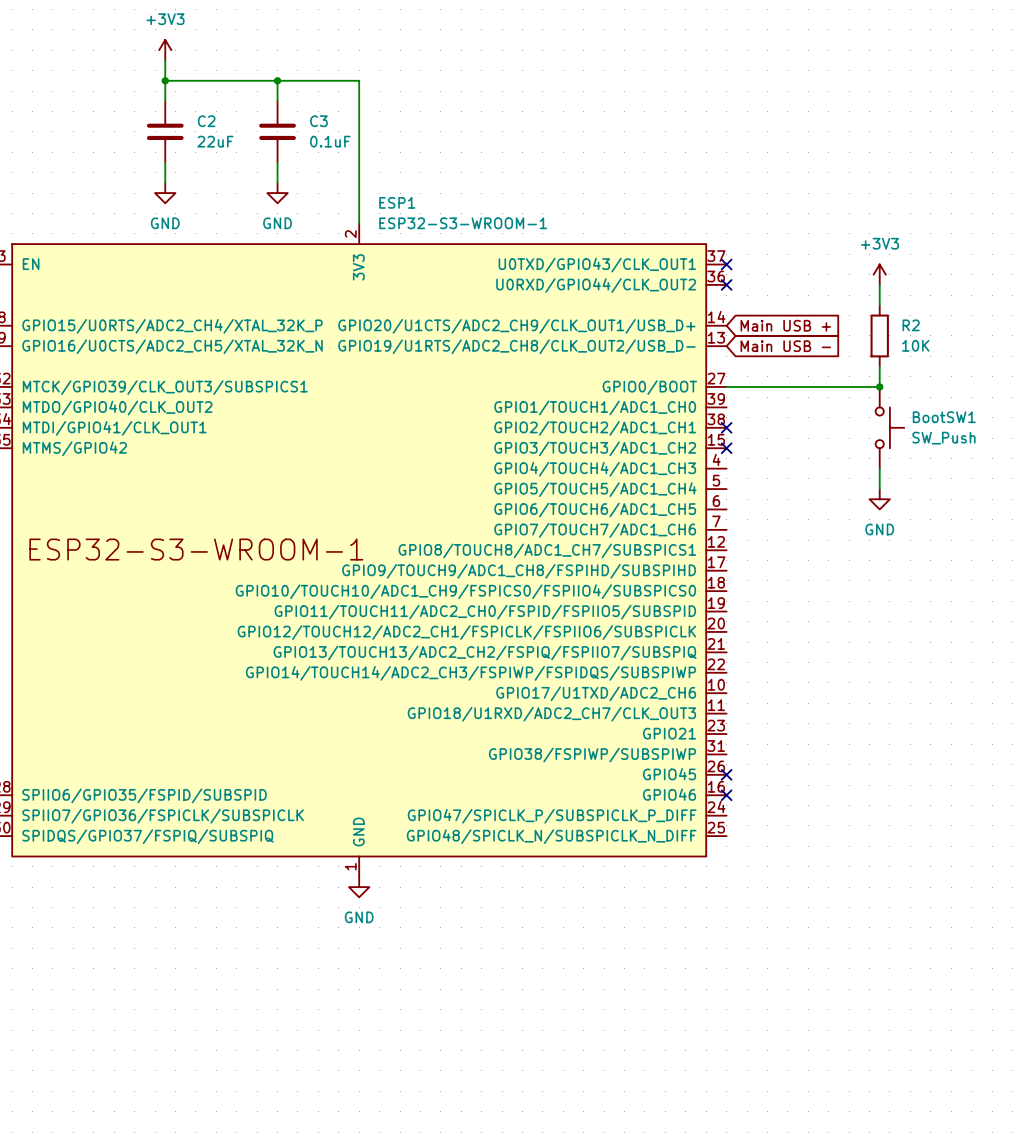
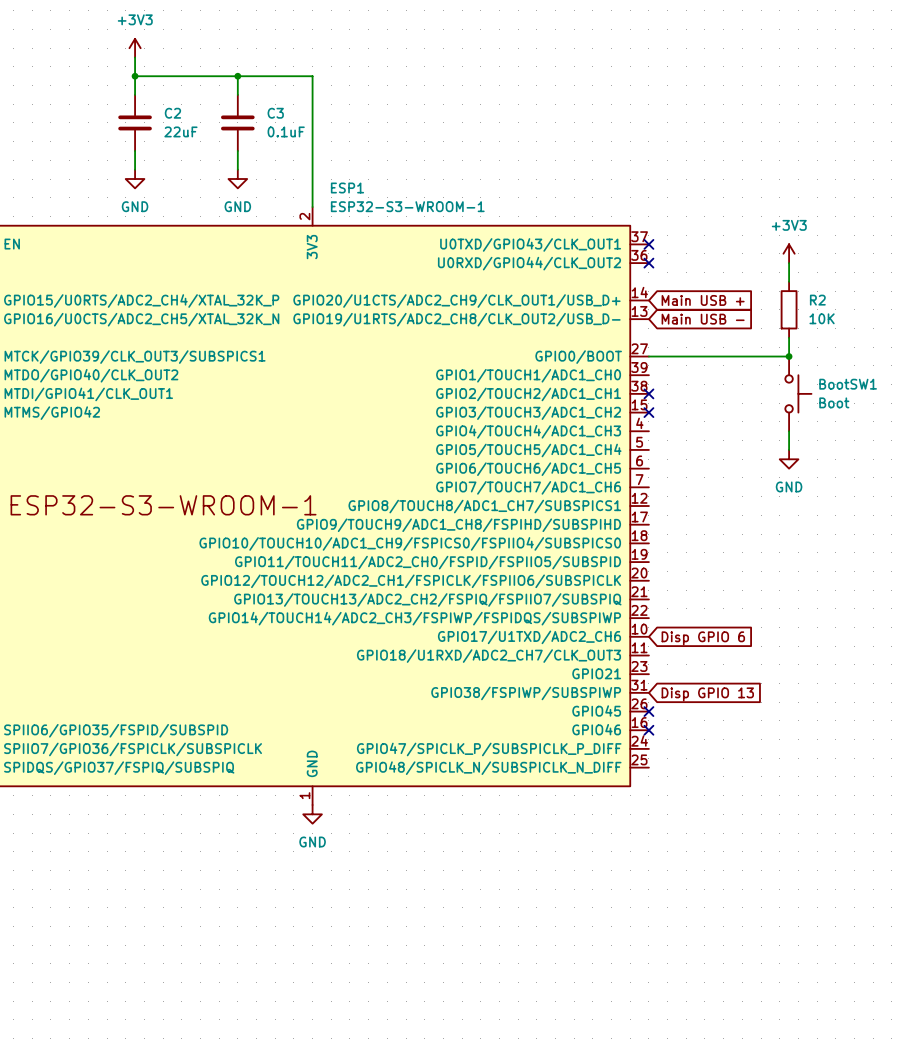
BootSW1 value: SW_Push (943, 438) -> Boot (834, 402)
global label: none -> Disp GPIO 6 (703, 638)
global label: none -> Disp GPIO 13 (707, 694)

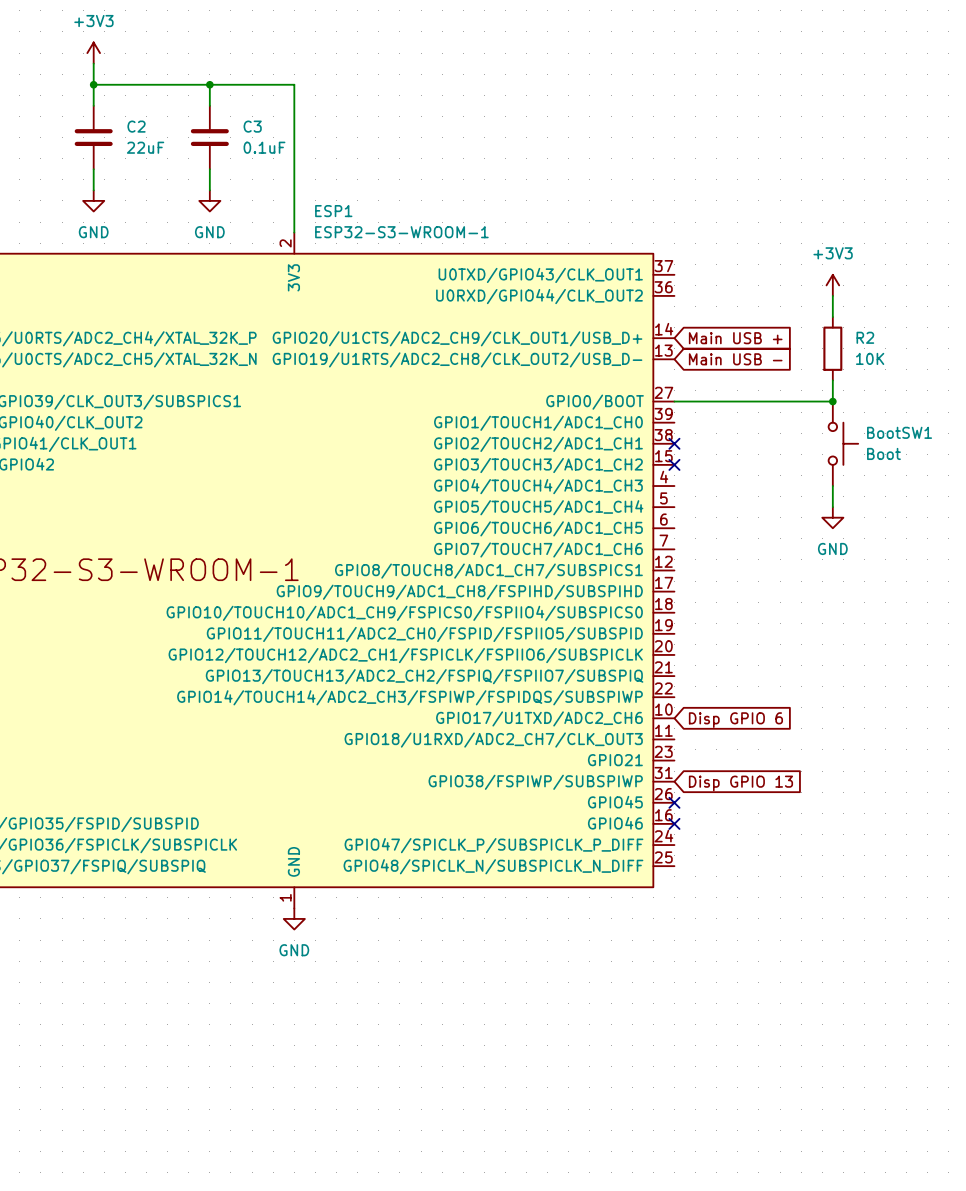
no-connect mark: (648, 244) -> none
no-connect mark: (648, 263) -> none

